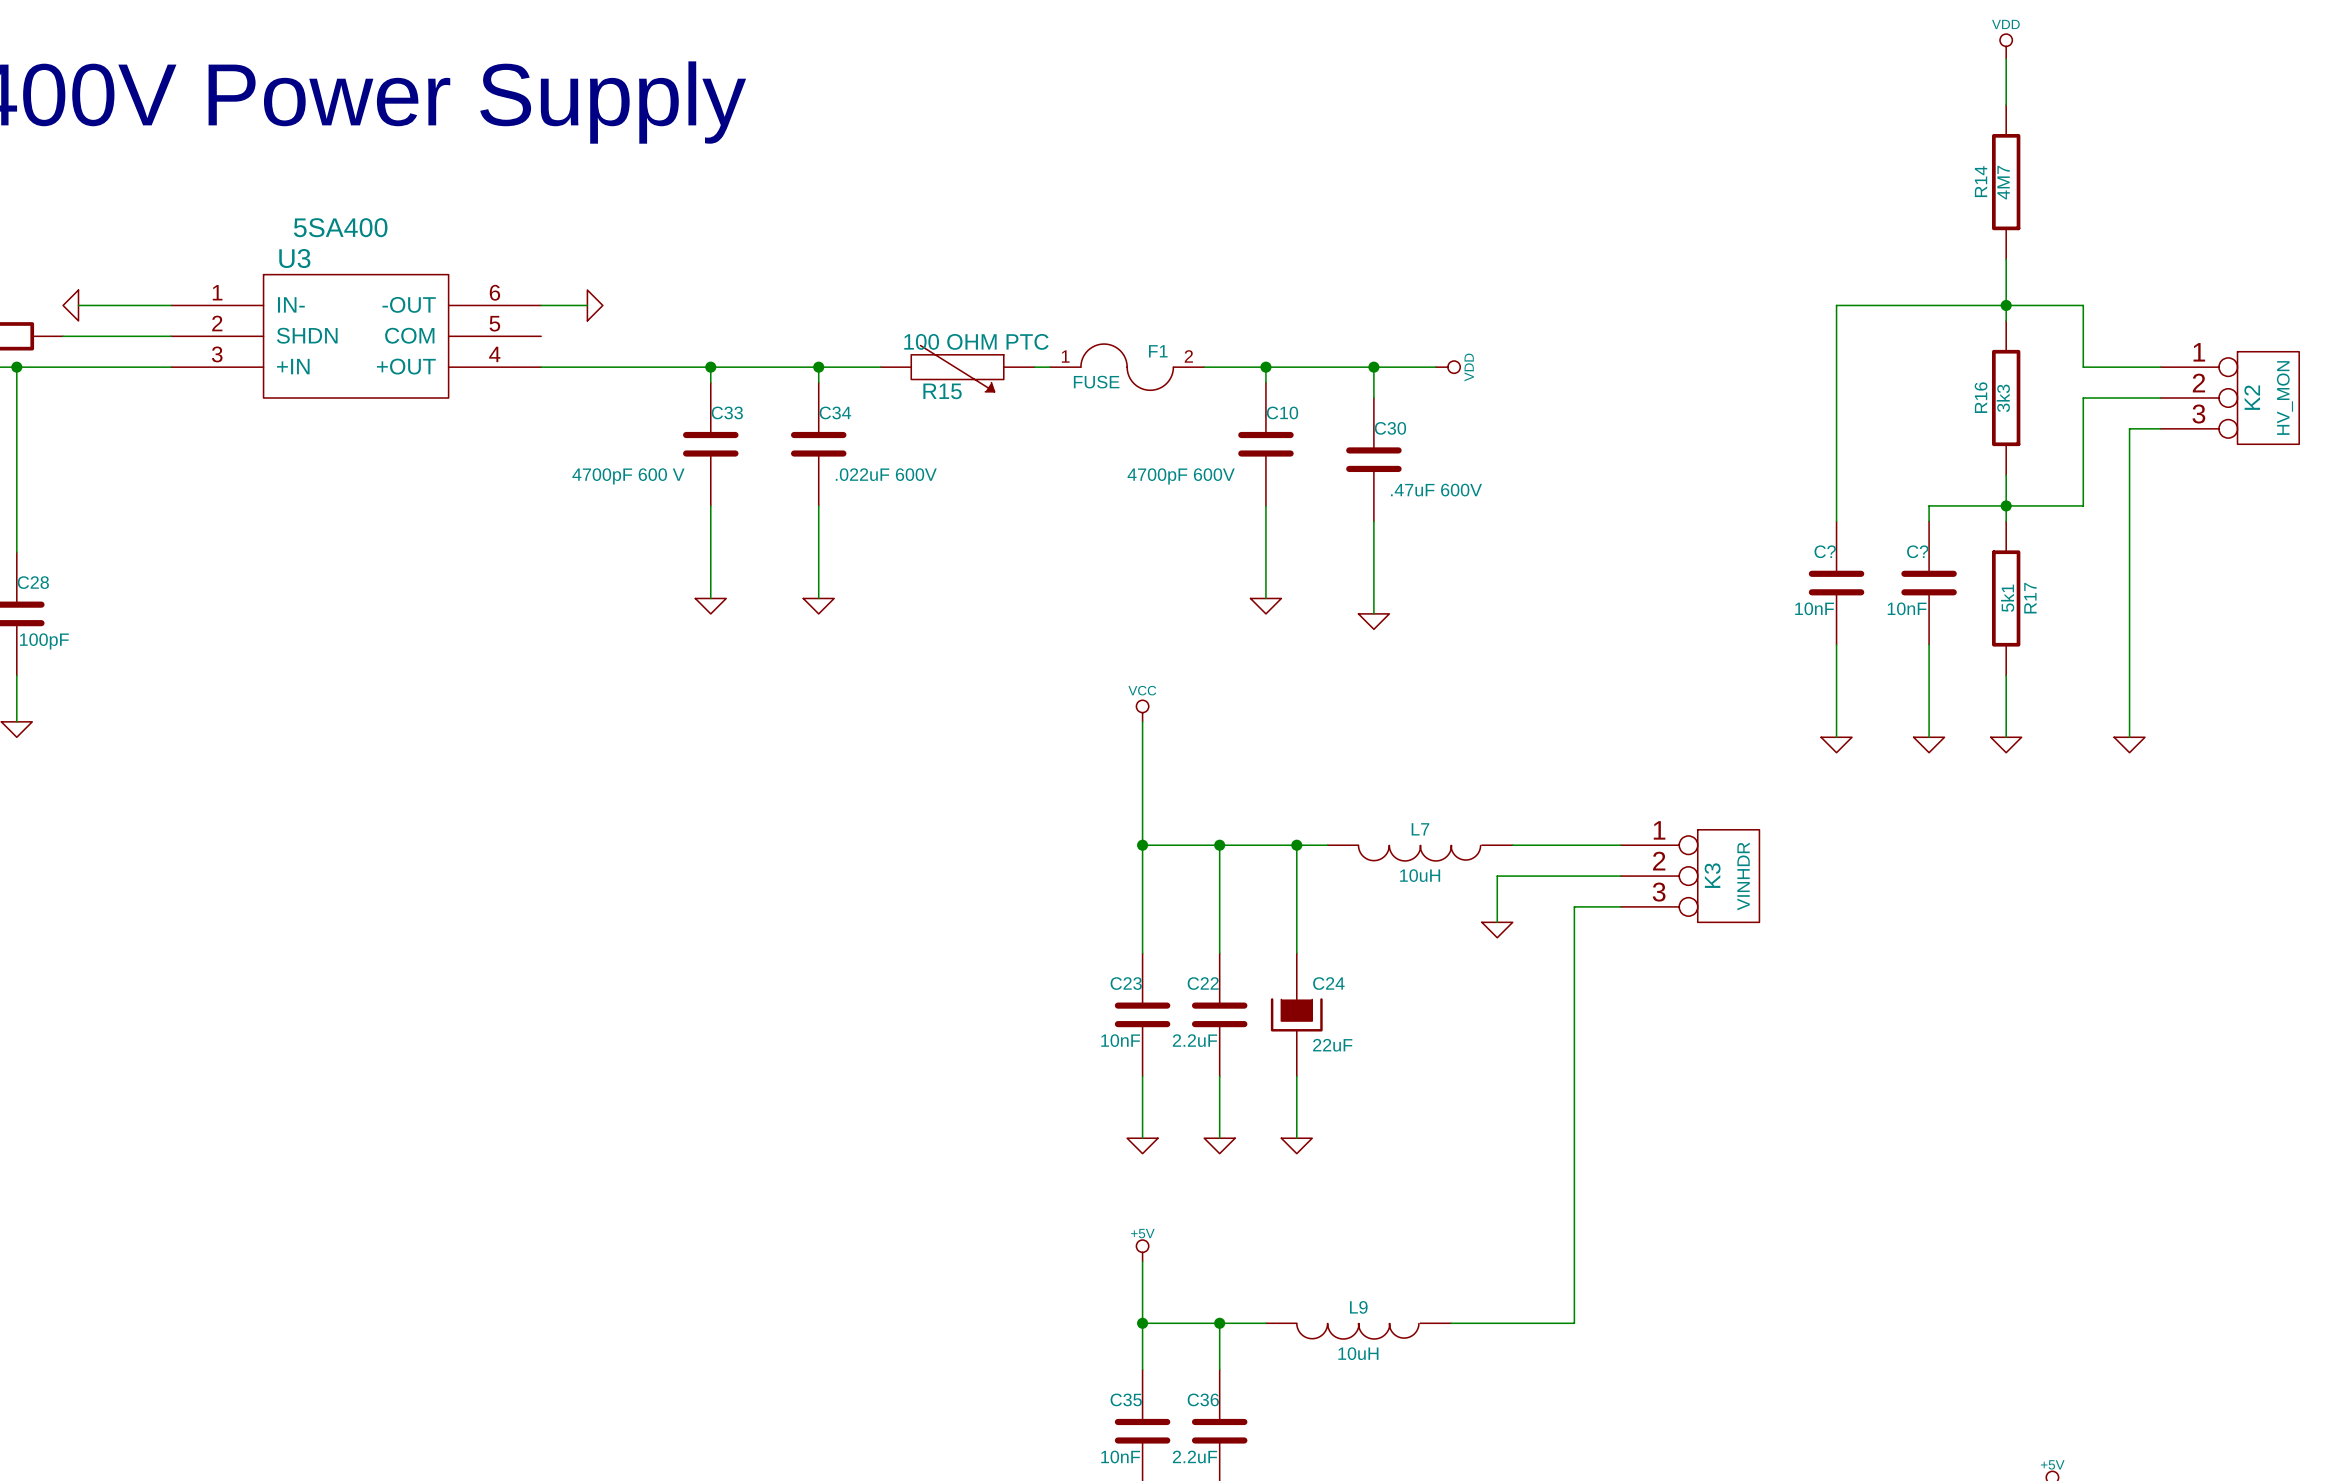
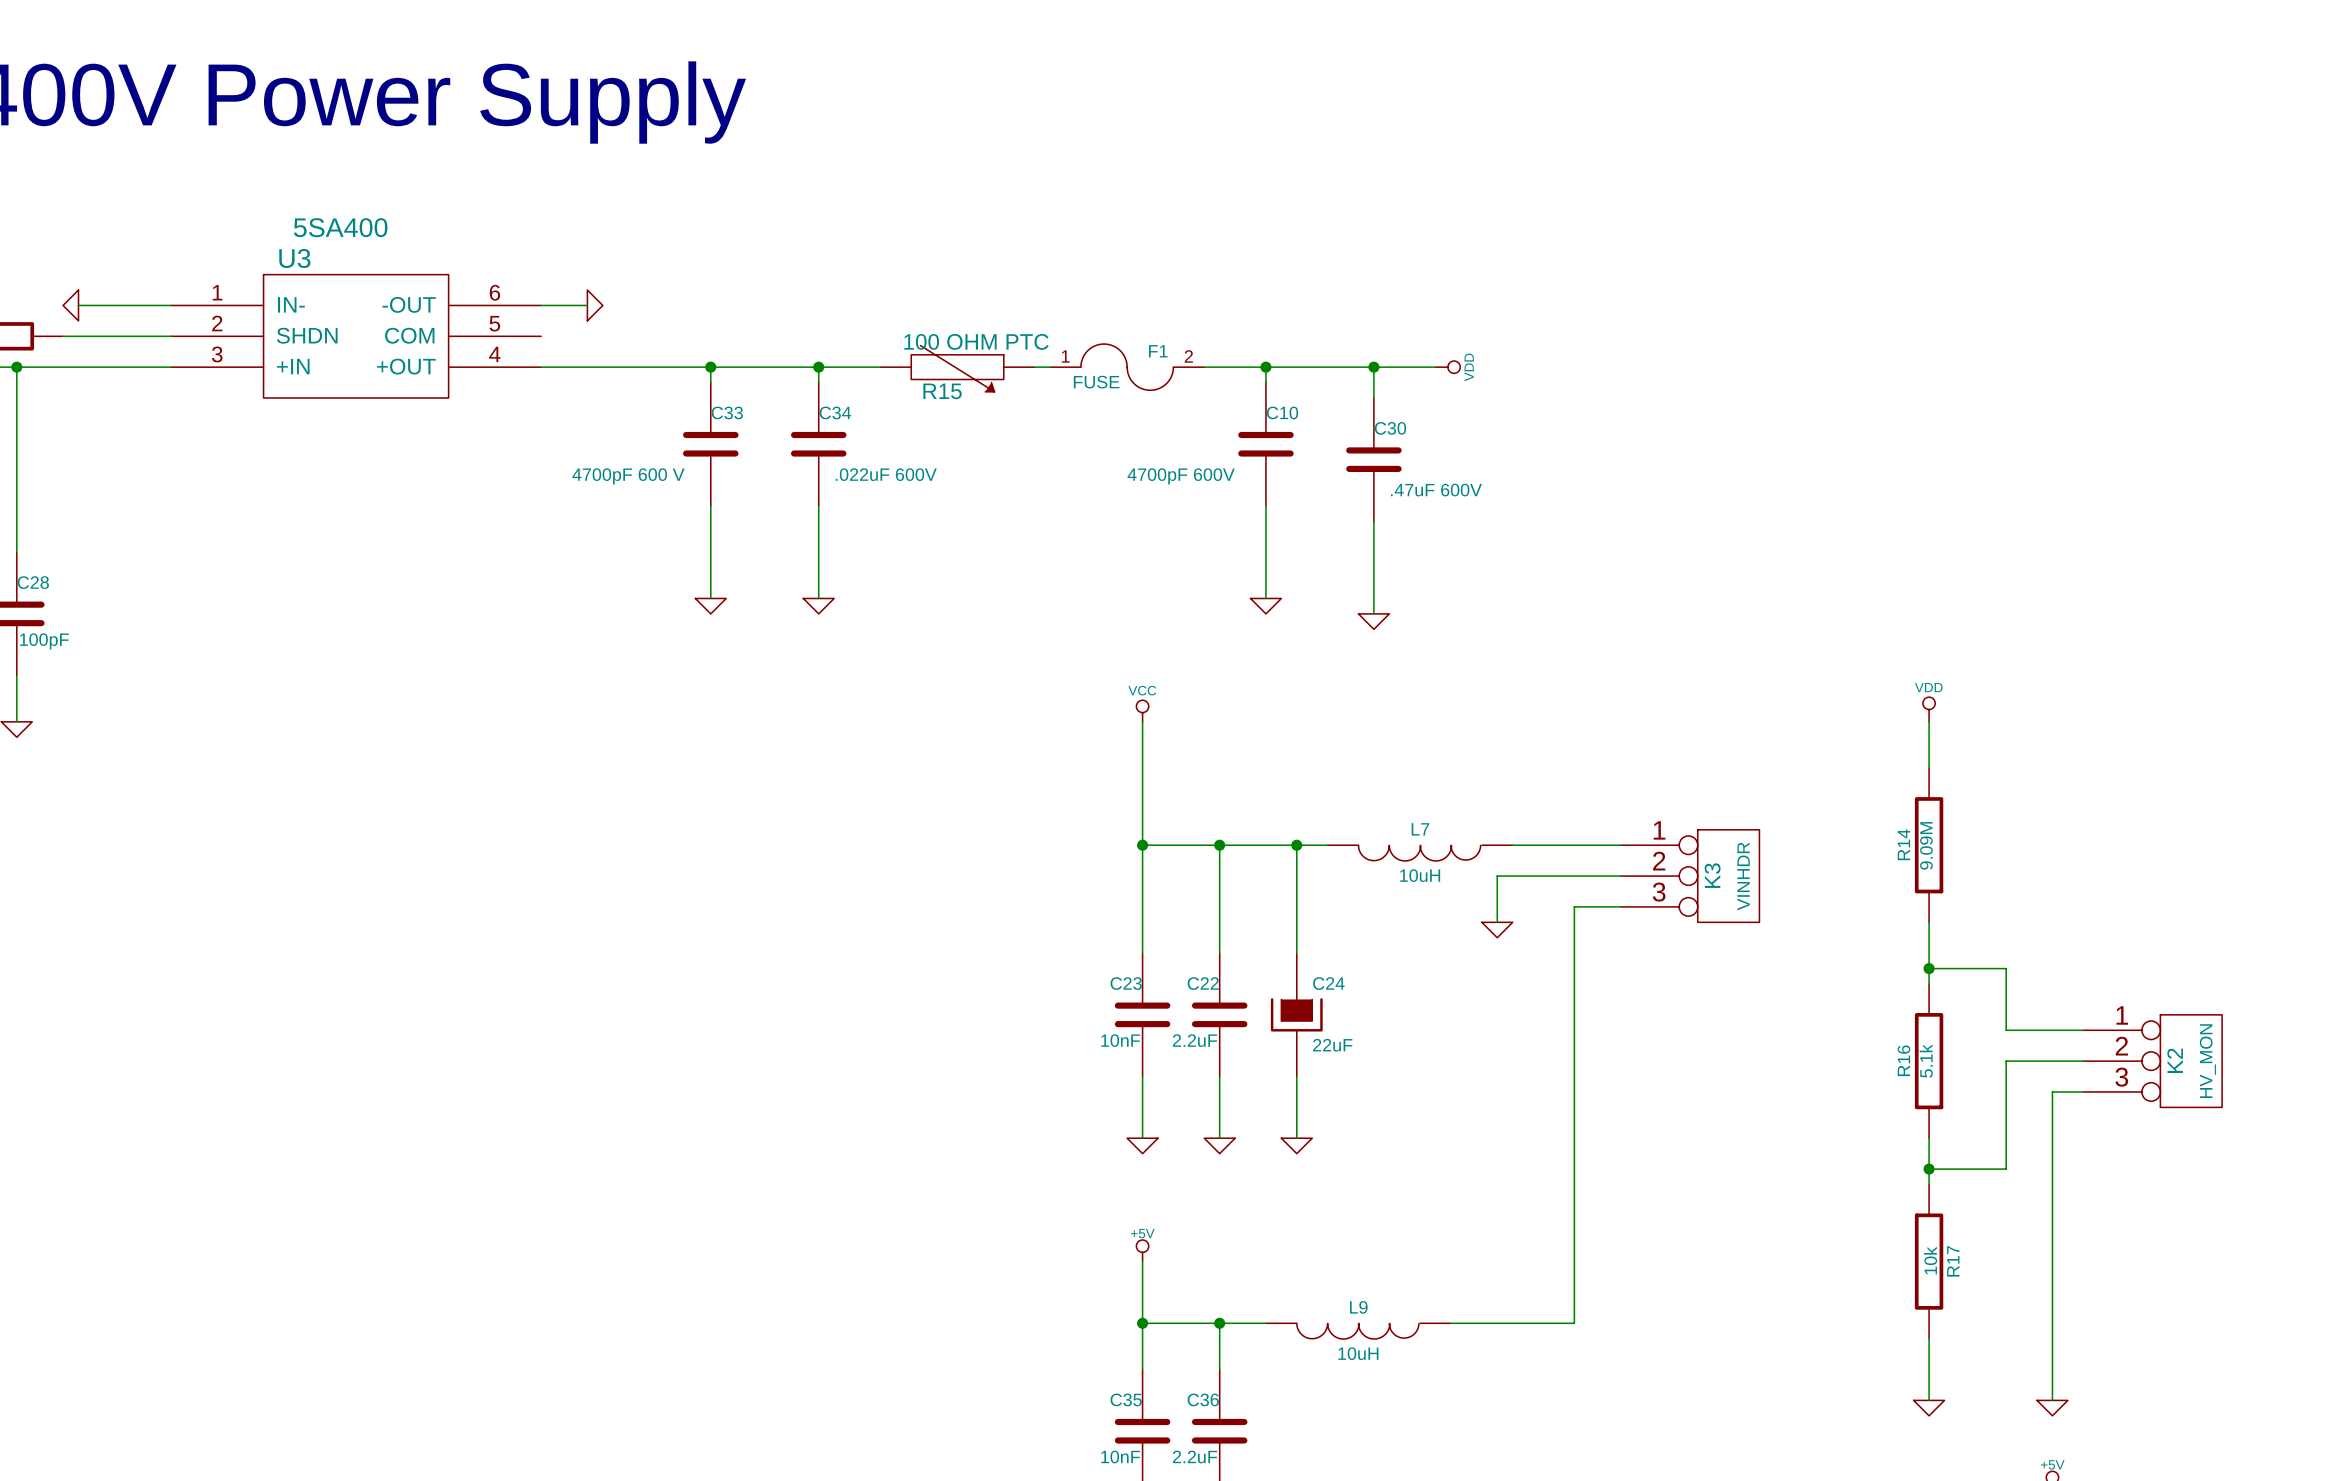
power symbol: VDD (2006, 46) -> none
wire: (2006, 58) (2006, 104) -> none
R14 value: 4M7 (2003, 182) -> 9.09M (1926, 845)
R14 position: (2006, 182) -> (1929, 845)
wire: (2006, 259) (2006, 320) -> none
junction: (2006, 305) -> none
wire: (2160, 367) (2083, 367) (2083, 305) (1836, 305) (1836, 521) -> none
R16 value: 3k3 (2003, 398) -> 5.1k (1926, 1061)
R16 position: (2006, 398) -> (1929, 1061)
wire: (2160, 398) (2083, 398) (2083, 505) (1929, 505) (1929, 521) -> none
K2 position: (2229, 398) -> (2152, 1061)
wire: (2160, 428) (2129, 428) (2129, 737) -> none
wire: (2006, 475) (2006, 521) -> none
junction: (2006, 505) -> none
C?: 10nF (1836, 583) -> none
C?: 10nF (1929, 583) -> none
R17 position: (2006, 598) -> (1929, 1261)
R17 value: 5k1 (2007, 598) -> 10k (1930, 1260)
wire: (1836, 644) (1836, 737) -> none
wire: (1929, 644) (1929, 721) -> none
wire: (2006, 675) (2006, 737) -> (1929, 922) (1929, 984)
power symbol: none -> VDD (1929, 709)
wire: none -> (1929, 737) (1929, 768)
power symbol: (1836, 744) -> none
power symbol: (1929, 744) -> none
power symbol: (2006, 744) -> none
power symbol: (2129, 744) -> none
wire: none -> (1929, 968) (2006, 968) (2006, 1030) (2083, 1030)
junction: none -> (1929, 968)
wire: none -> (2083, 1061) (2006, 1061) (2006, 1169) (1929, 1169)
wire: none -> (2083, 1091) (2052, 1091) (2052, 1400)
wire: none -> (1929, 1138) (1929, 1184)
junction: none -> (1929, 1169)
wire: none -> (1929, 1338) (1929, 1400)
power symbol: none -> (1929, 1408)
power symbol: none -> (2052, 1408)

